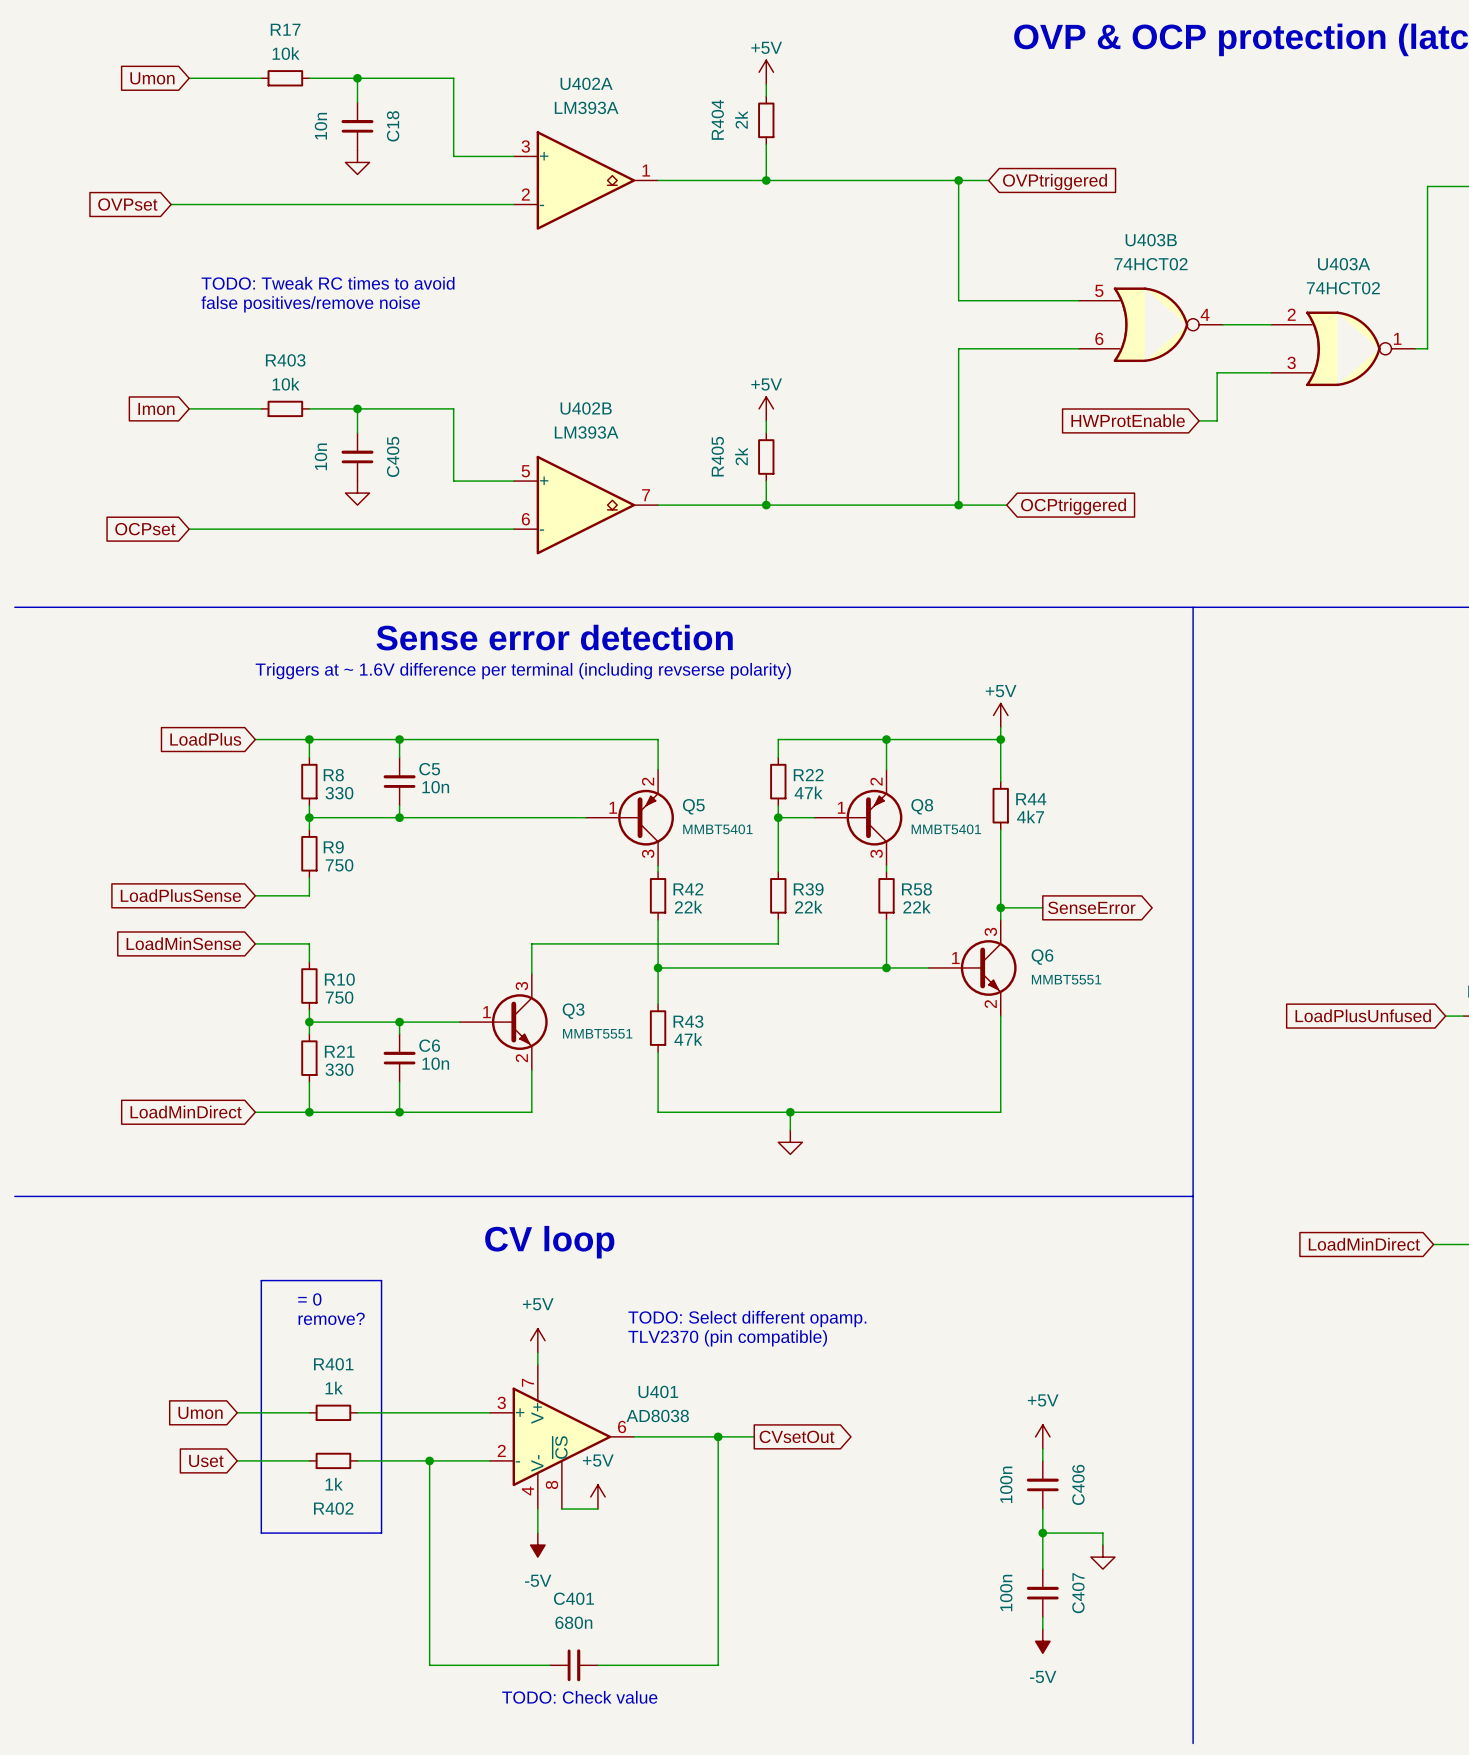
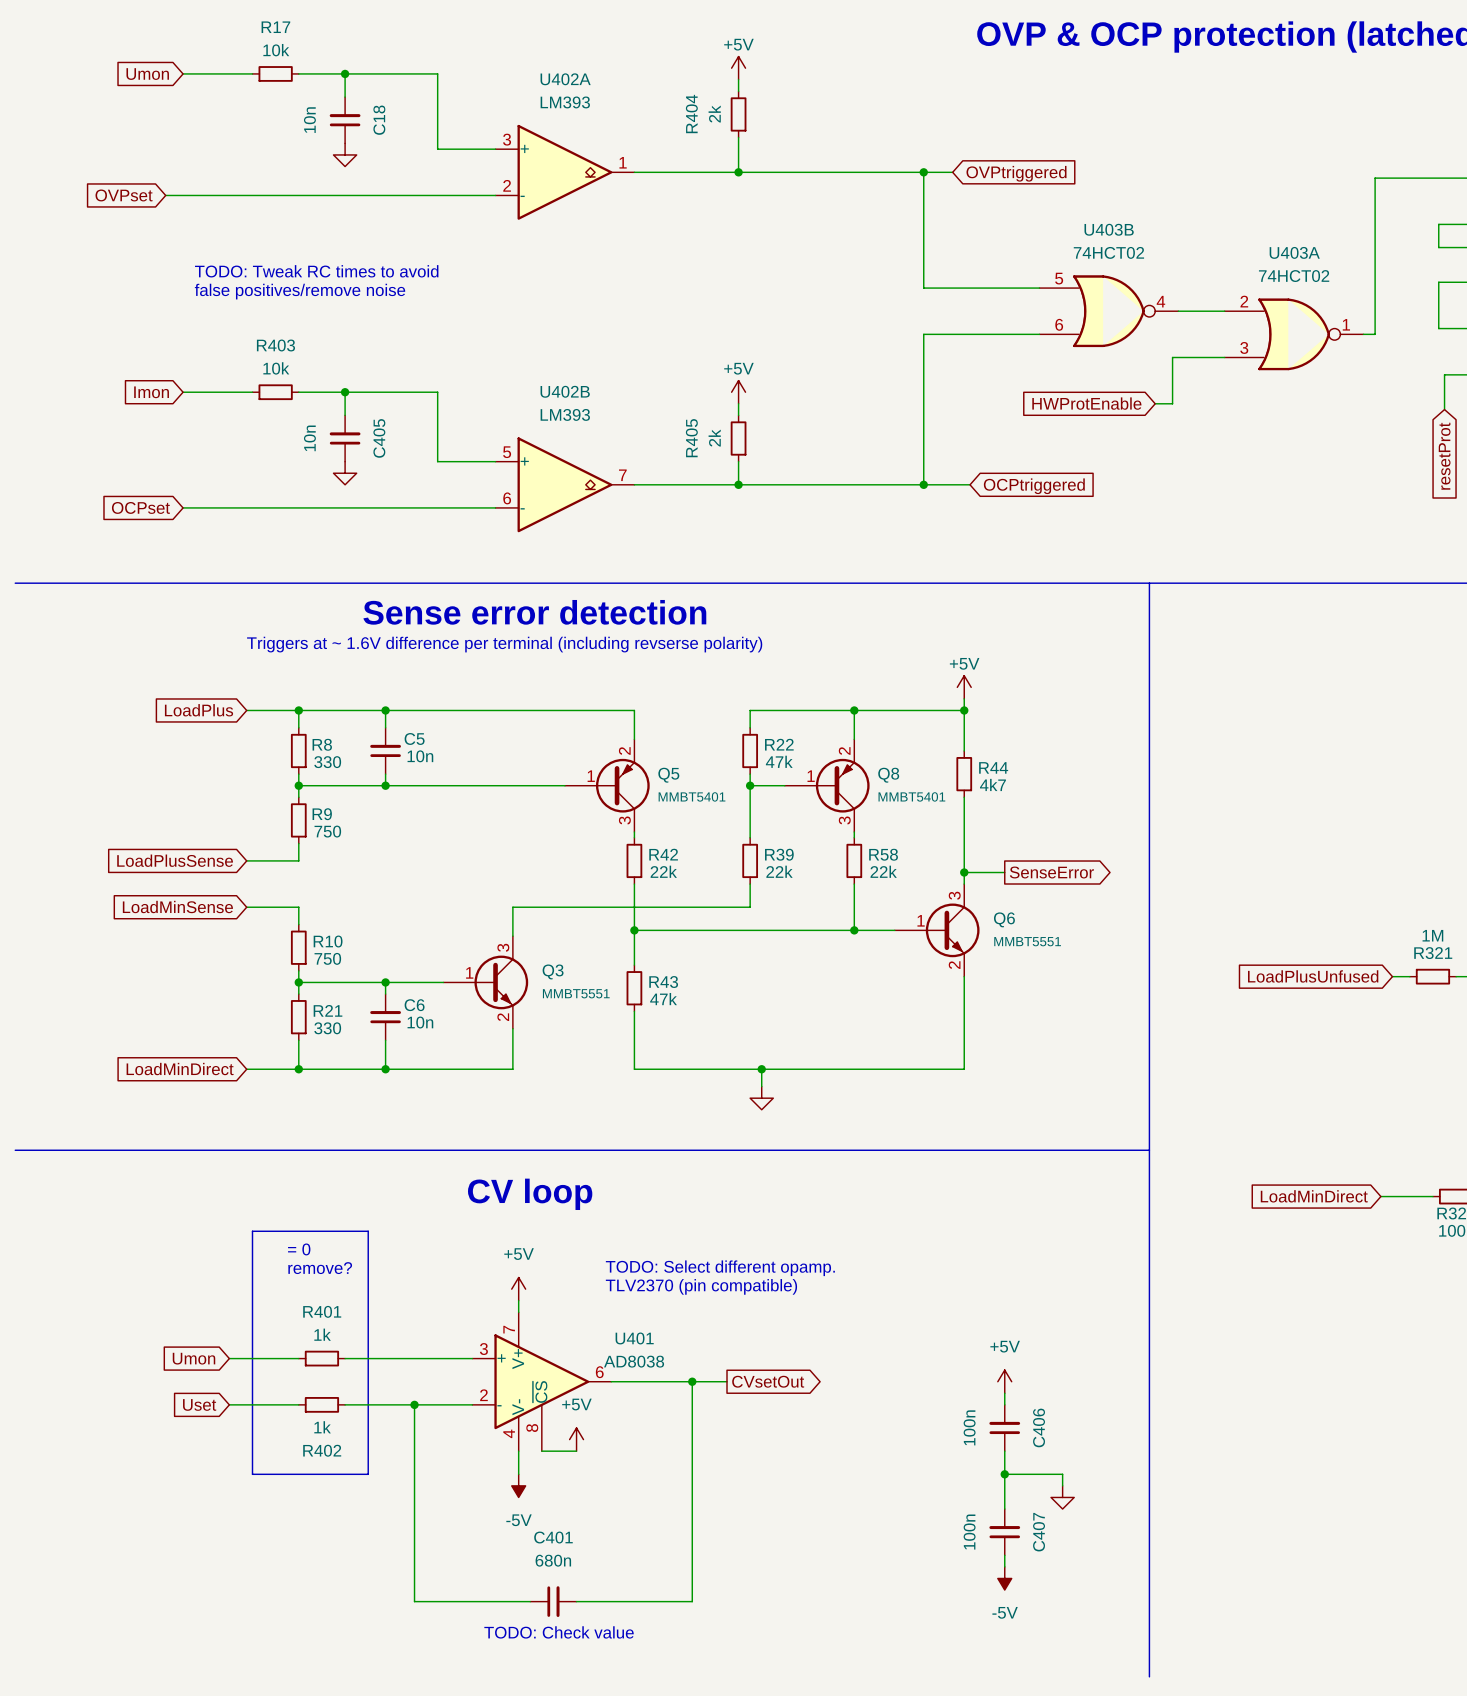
U402A value: LM393A (586, 107) -> LM393 (565, 102)
U402B value: LM393A (586, 432) -> LM393 (565, 414)

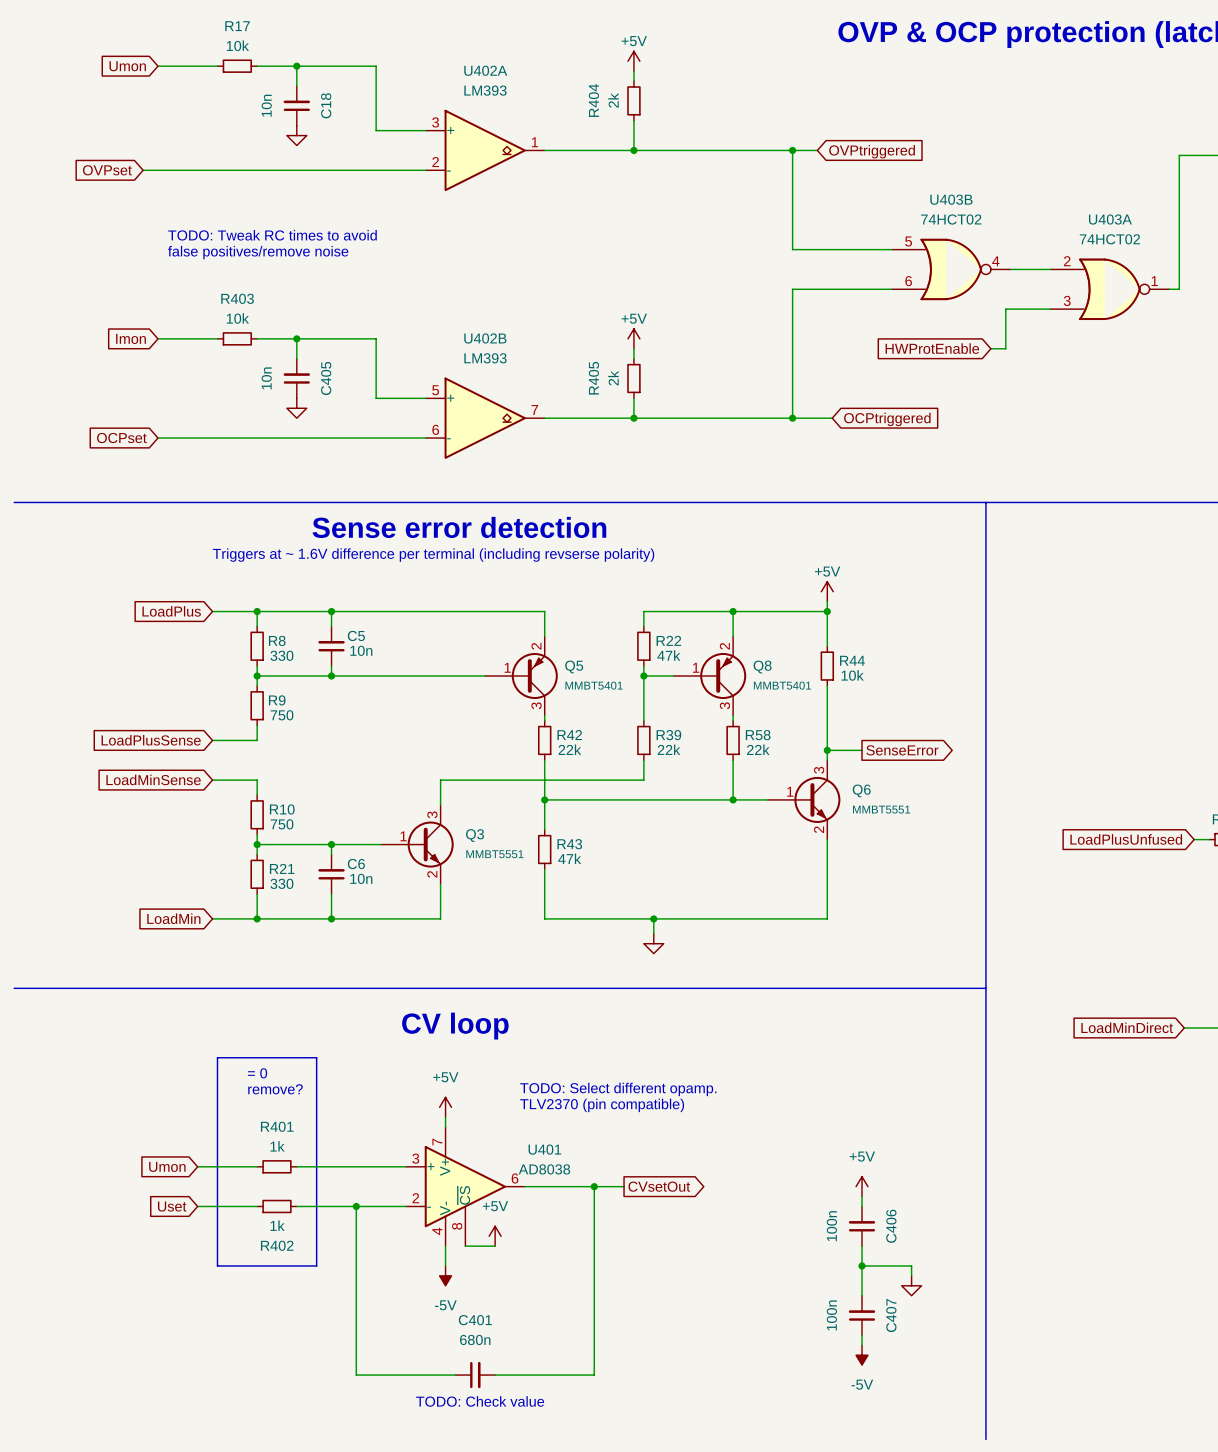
R44 value: 4k7 (992, 784) -> 10k (852, 675)
global label: LoadMinDirect (180, 1069) -> LoadMin (173, 918)

